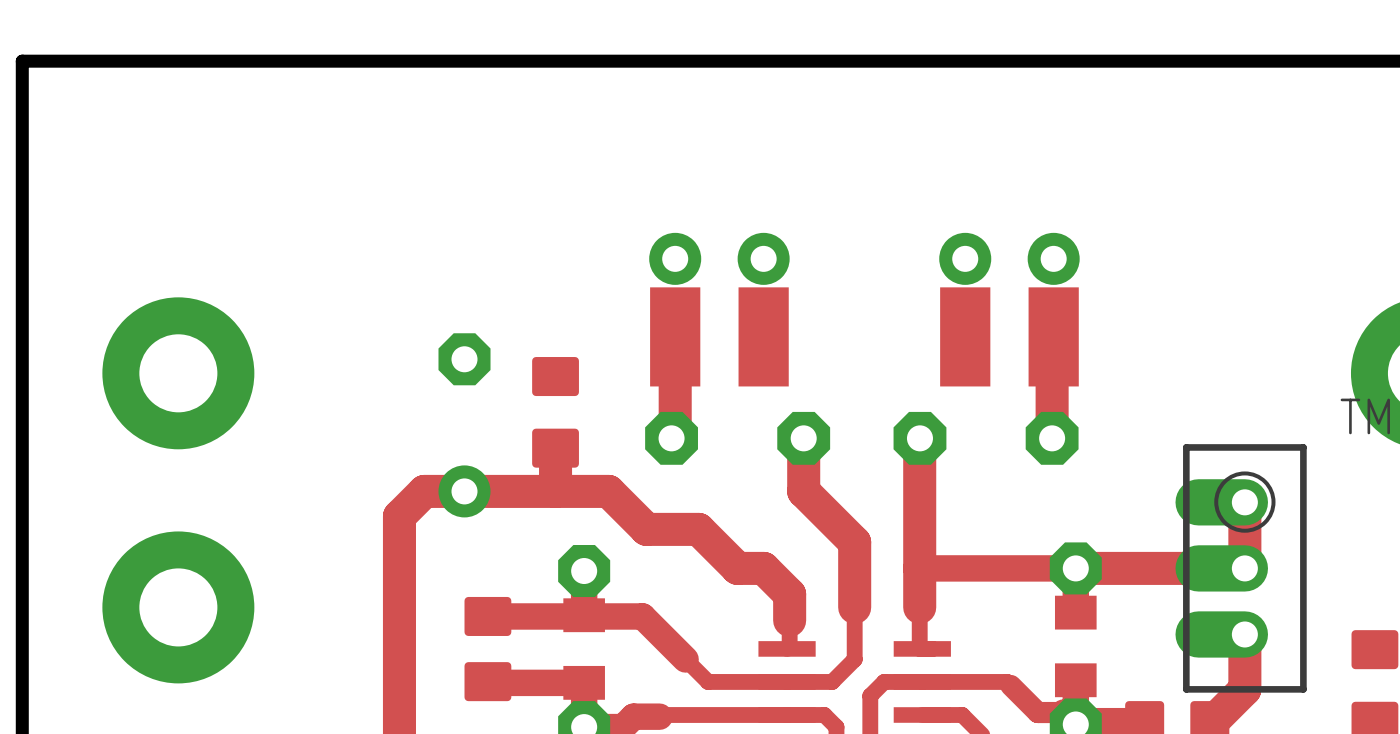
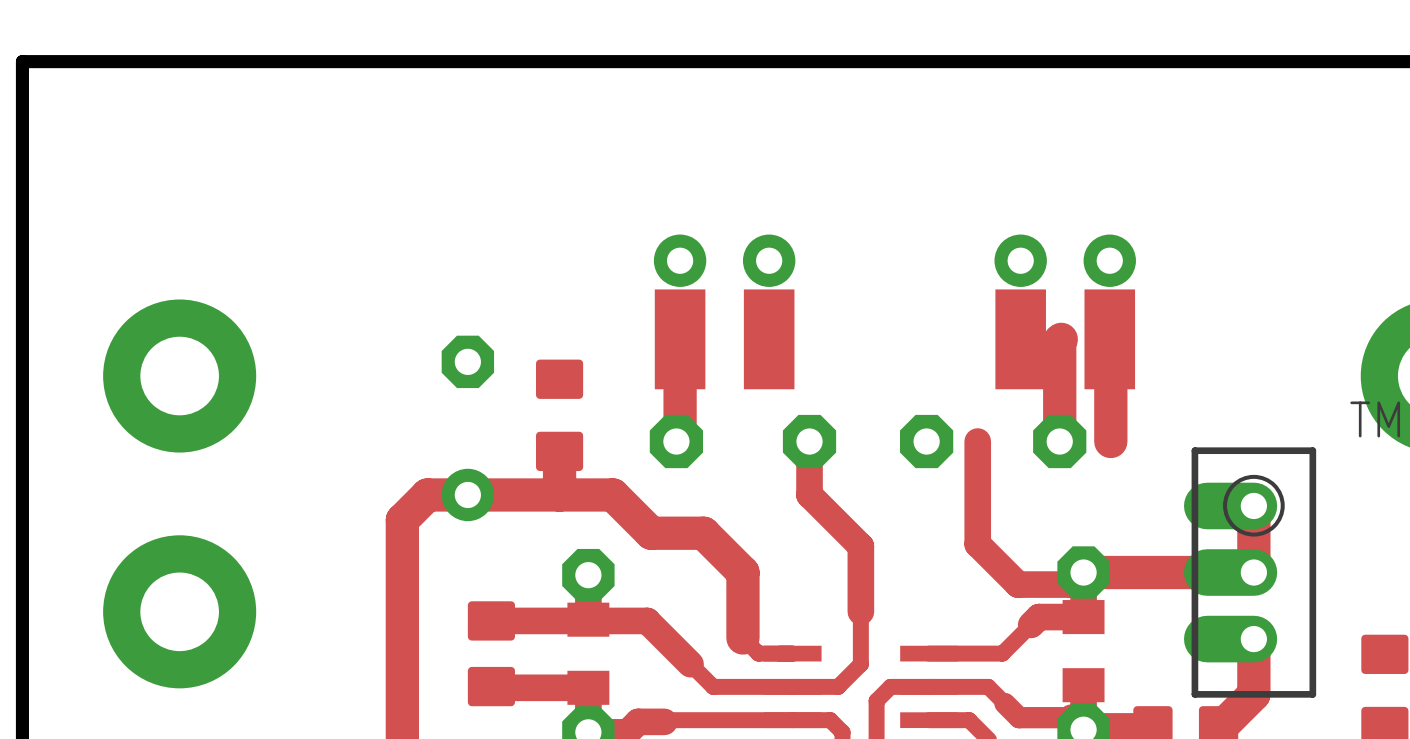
part position: (1009, 309) -> (1065, 311)
top track: none -> (1109, 339) (1110, 441)
top track width: thick (803, 438) (803, 491) (854, 542) (854, 607) -> thin (809, 441) (809, 494) (860, 546) (860, 611)
top track: (919, 438) (919, 648) (922, 648) -> none
top track: (737, 568) (763, 568) (789, 594) (789, 646) (787, 648) -> (742, 572) (742, 638) (758, 653) (792, 653)
top track: (1075, 568) (919, 568) -> (1083, 572) (1071, 584) (1018, 584) (977, 544) (977, 441)
top track: none -> (1083, 617) (1039, 617) (1002, 653) (939, 653)
top track: (981, 681) (1007, 681) (1037, 712) -> (988, 686) (1019, 717) (1045, 717)

